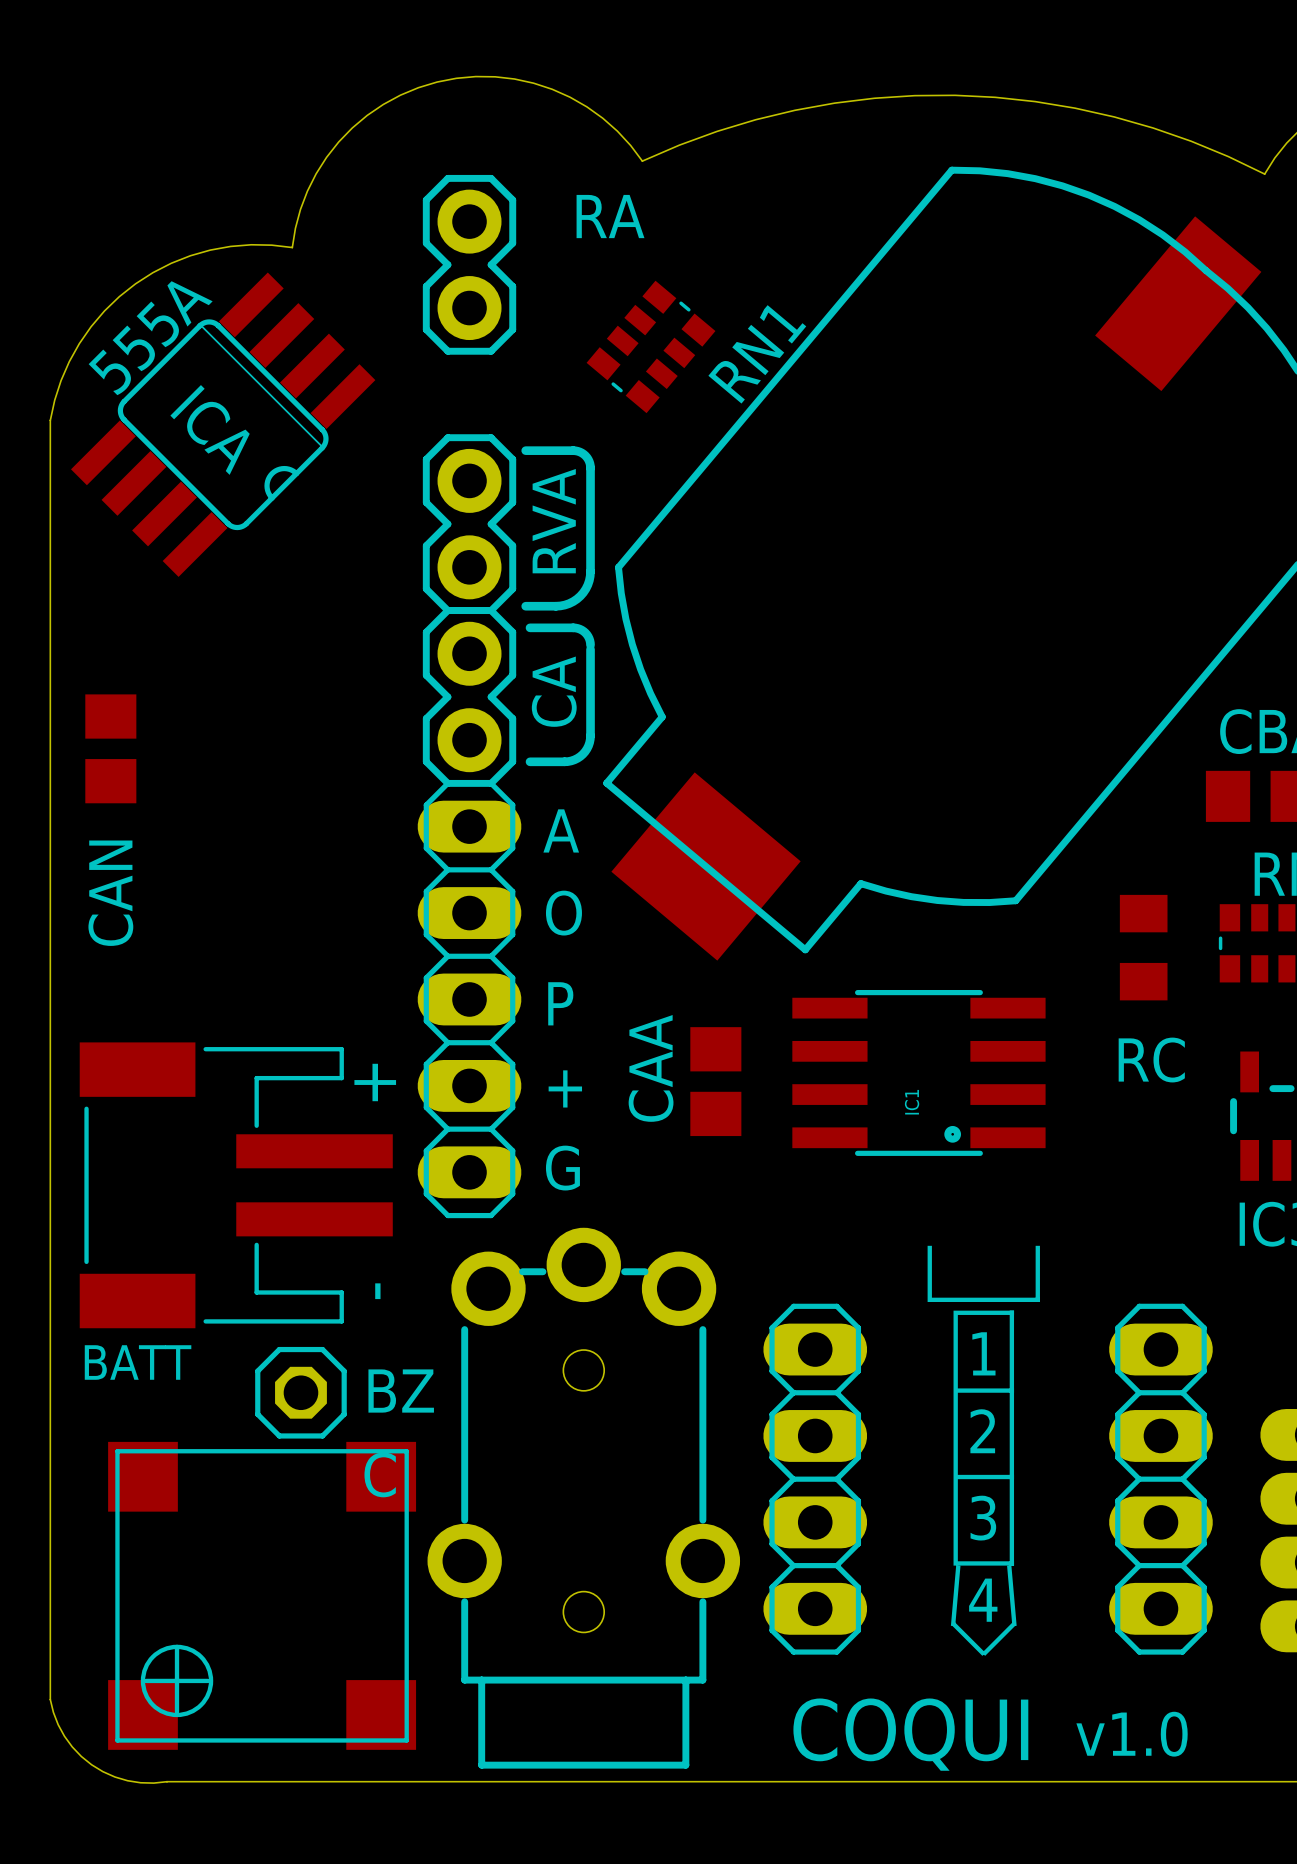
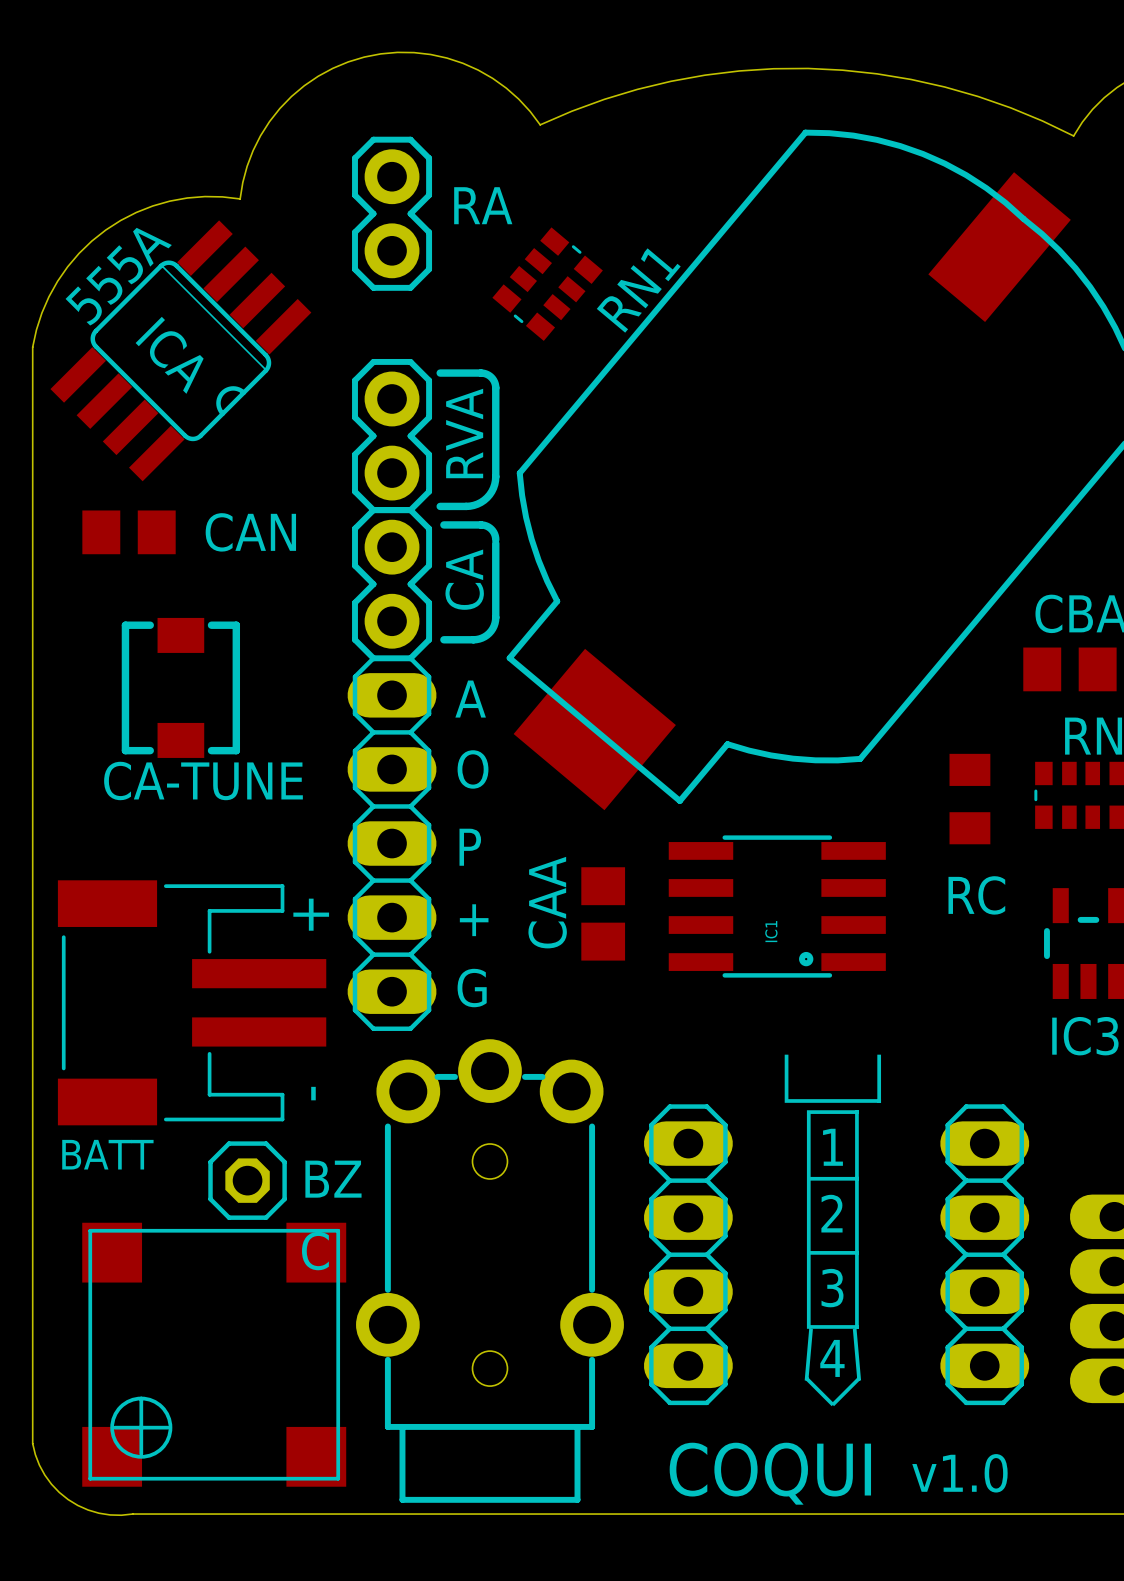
RA name position: RA (610, 216) -> RA (483, 205)
CAN rotation: 0° (110, 748) -> 90° clockwise (129, 532)
CAN position: (110, 748) -> (129, 532)
CA-TUNE: none -> (180, 687)
CAN name position: CAN (110, 893) -> CAN (250, 532)

